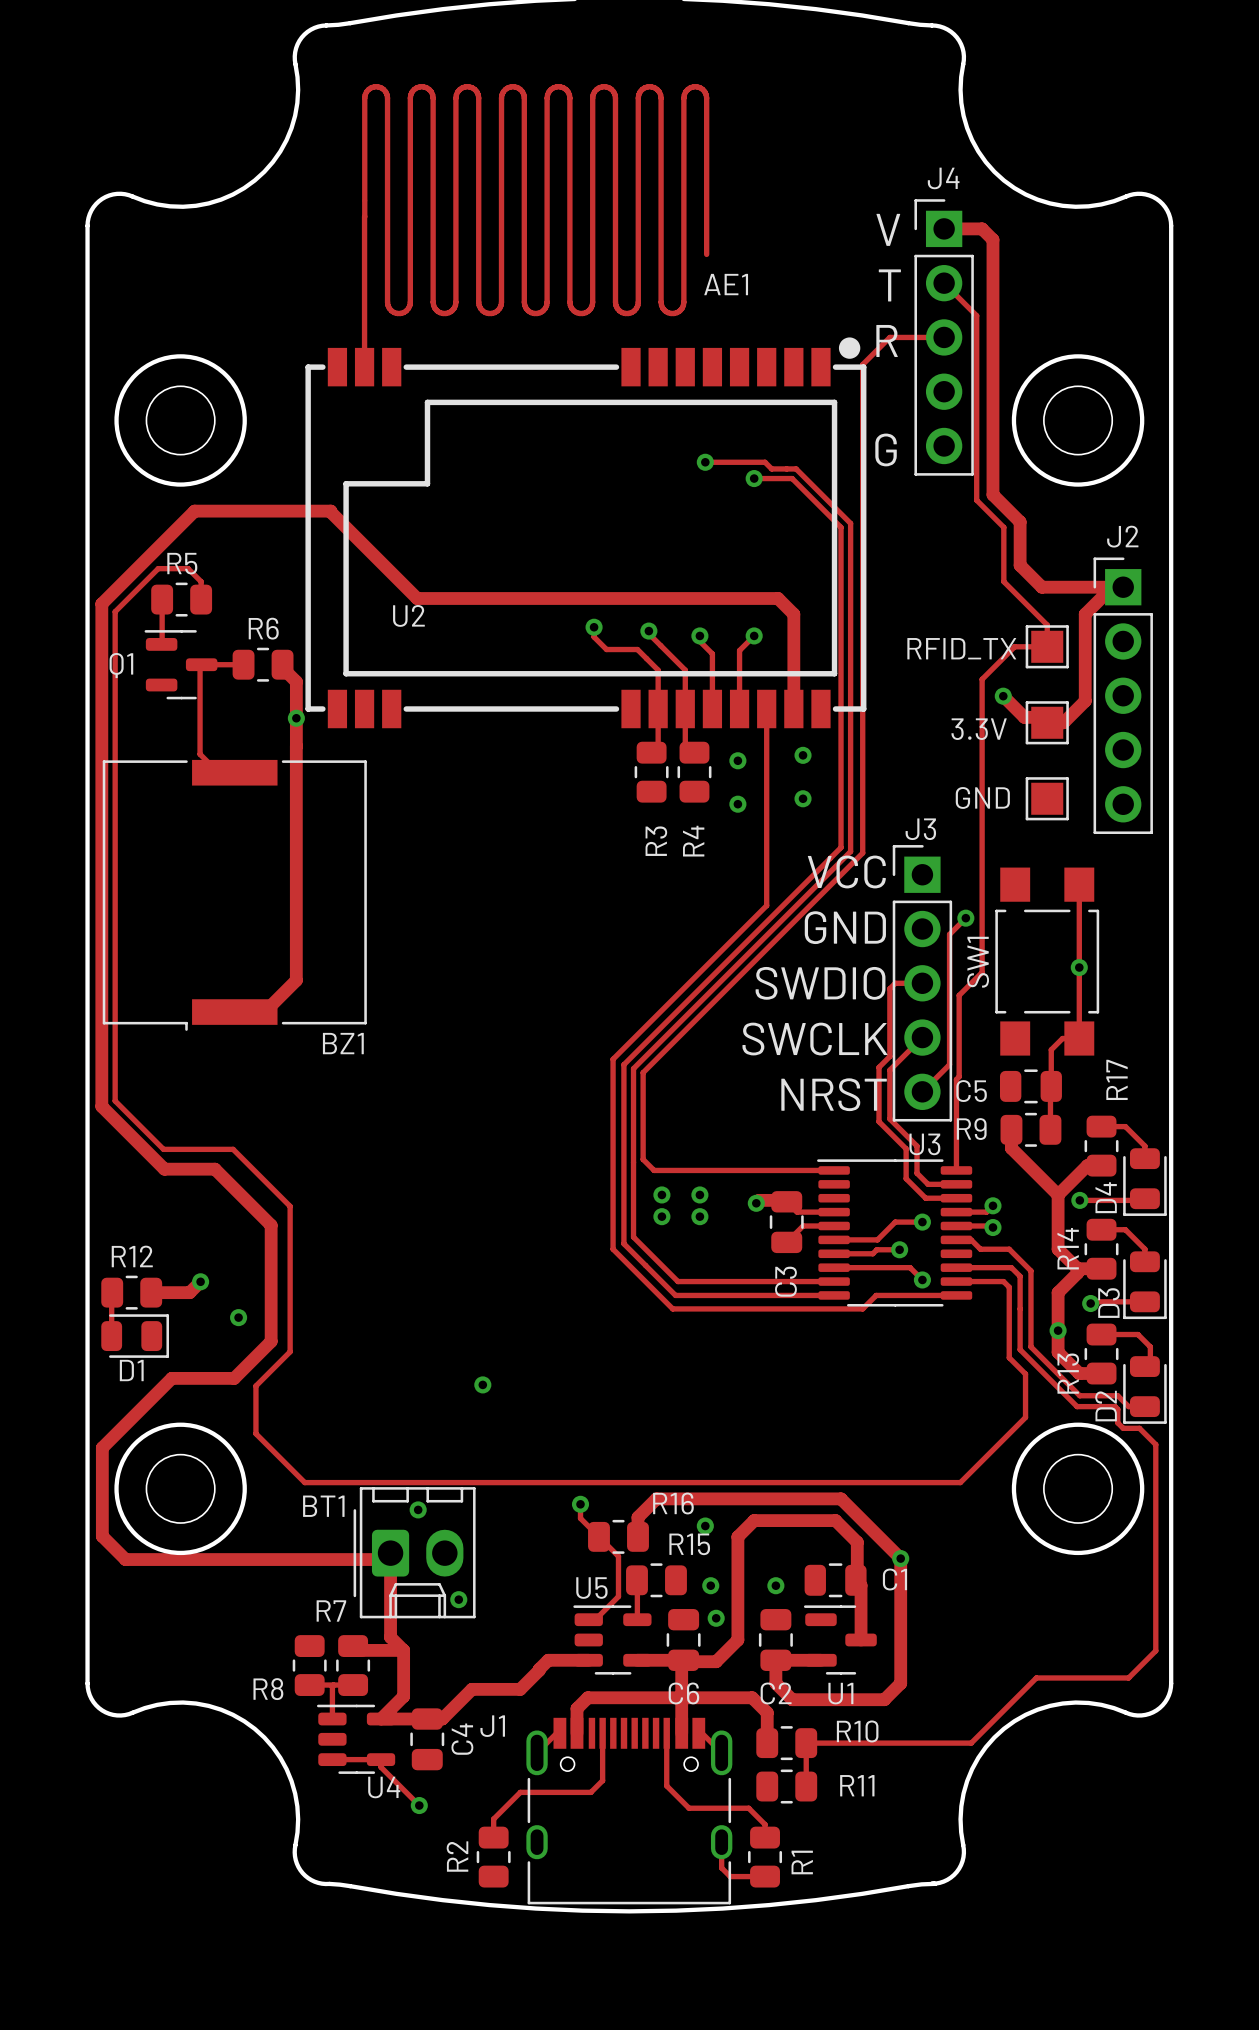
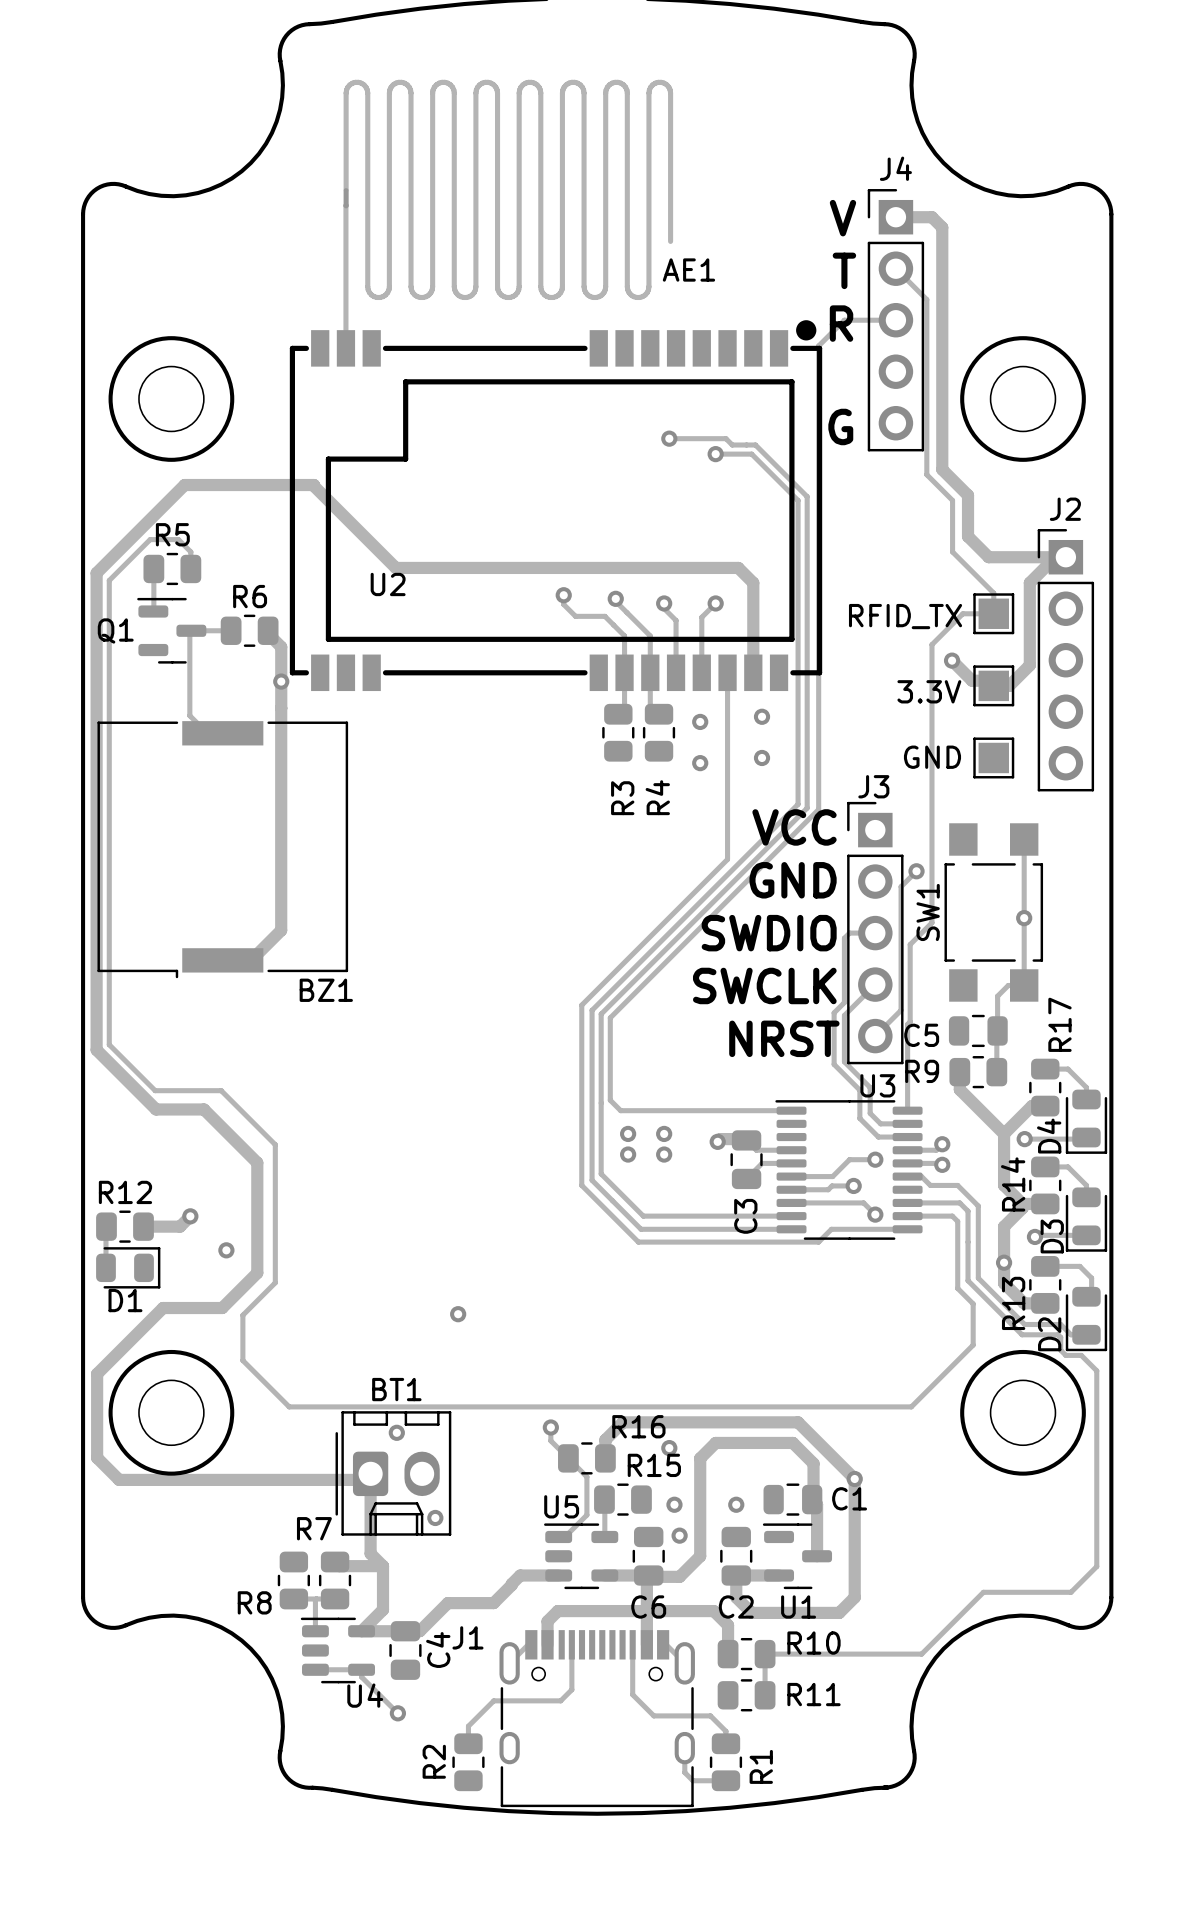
BT1 name position: BT1 (323, 1506) -> BT1 (396, 1389)

